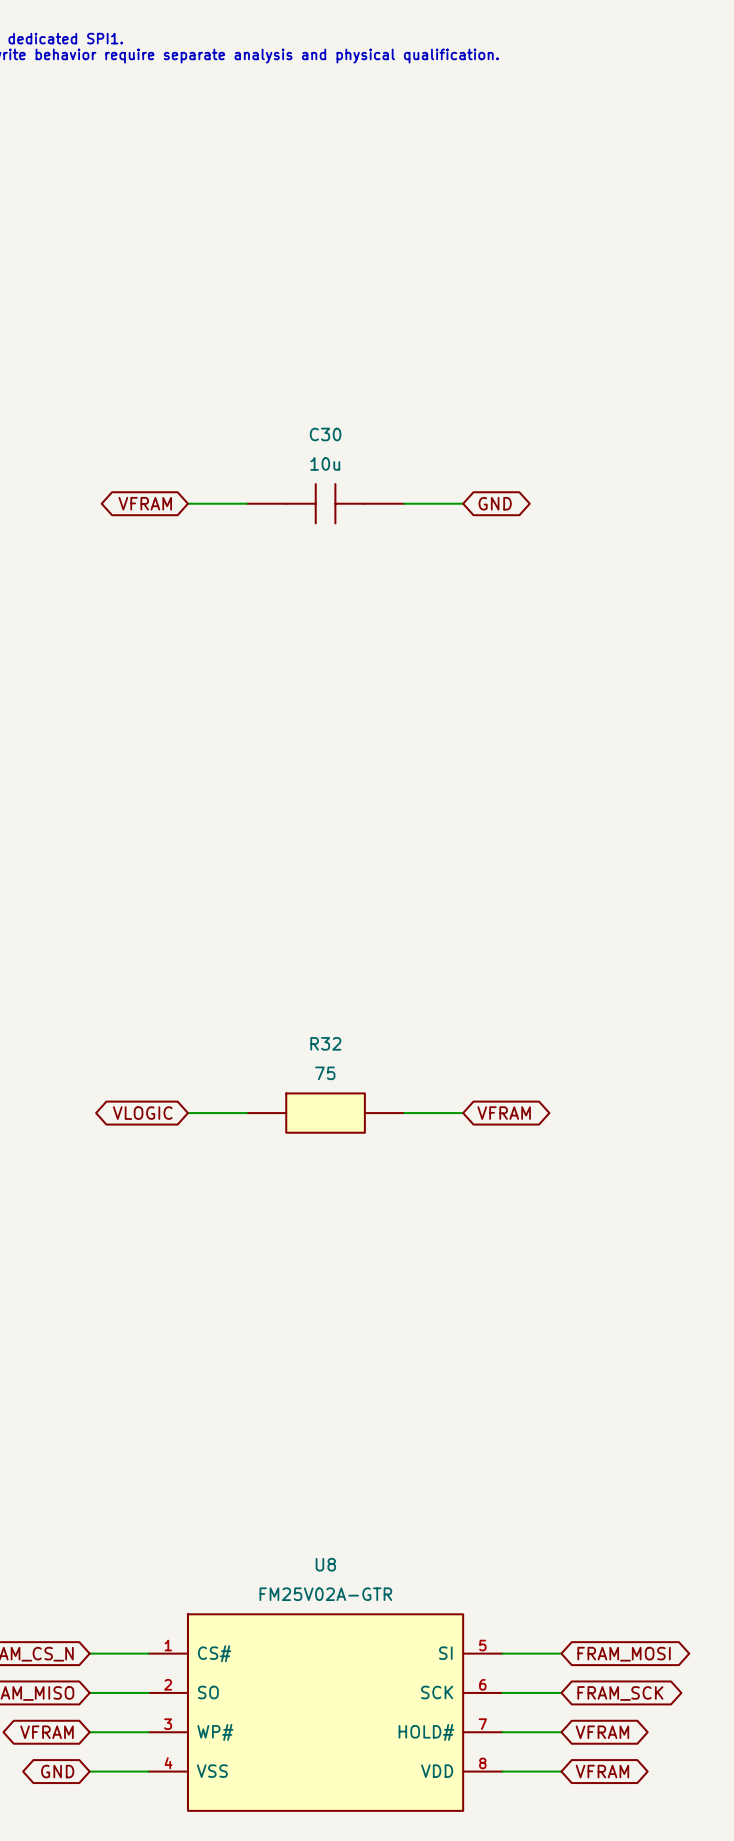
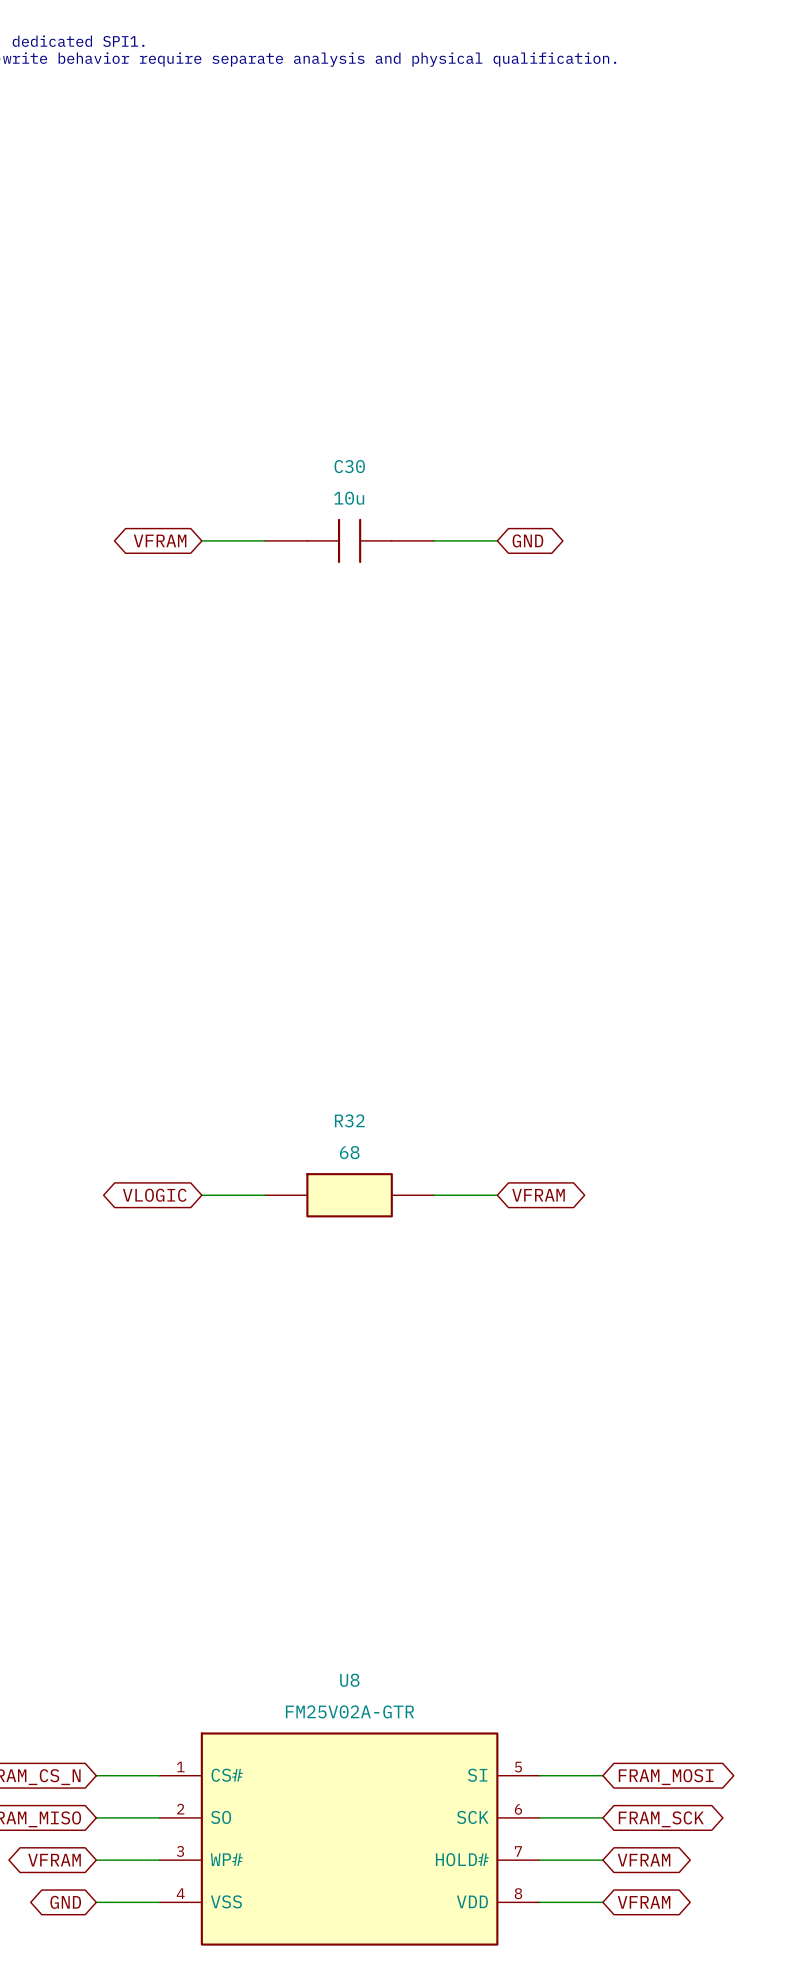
R32 value: 75 (325, 1073) -> 68 (349, 1152)

